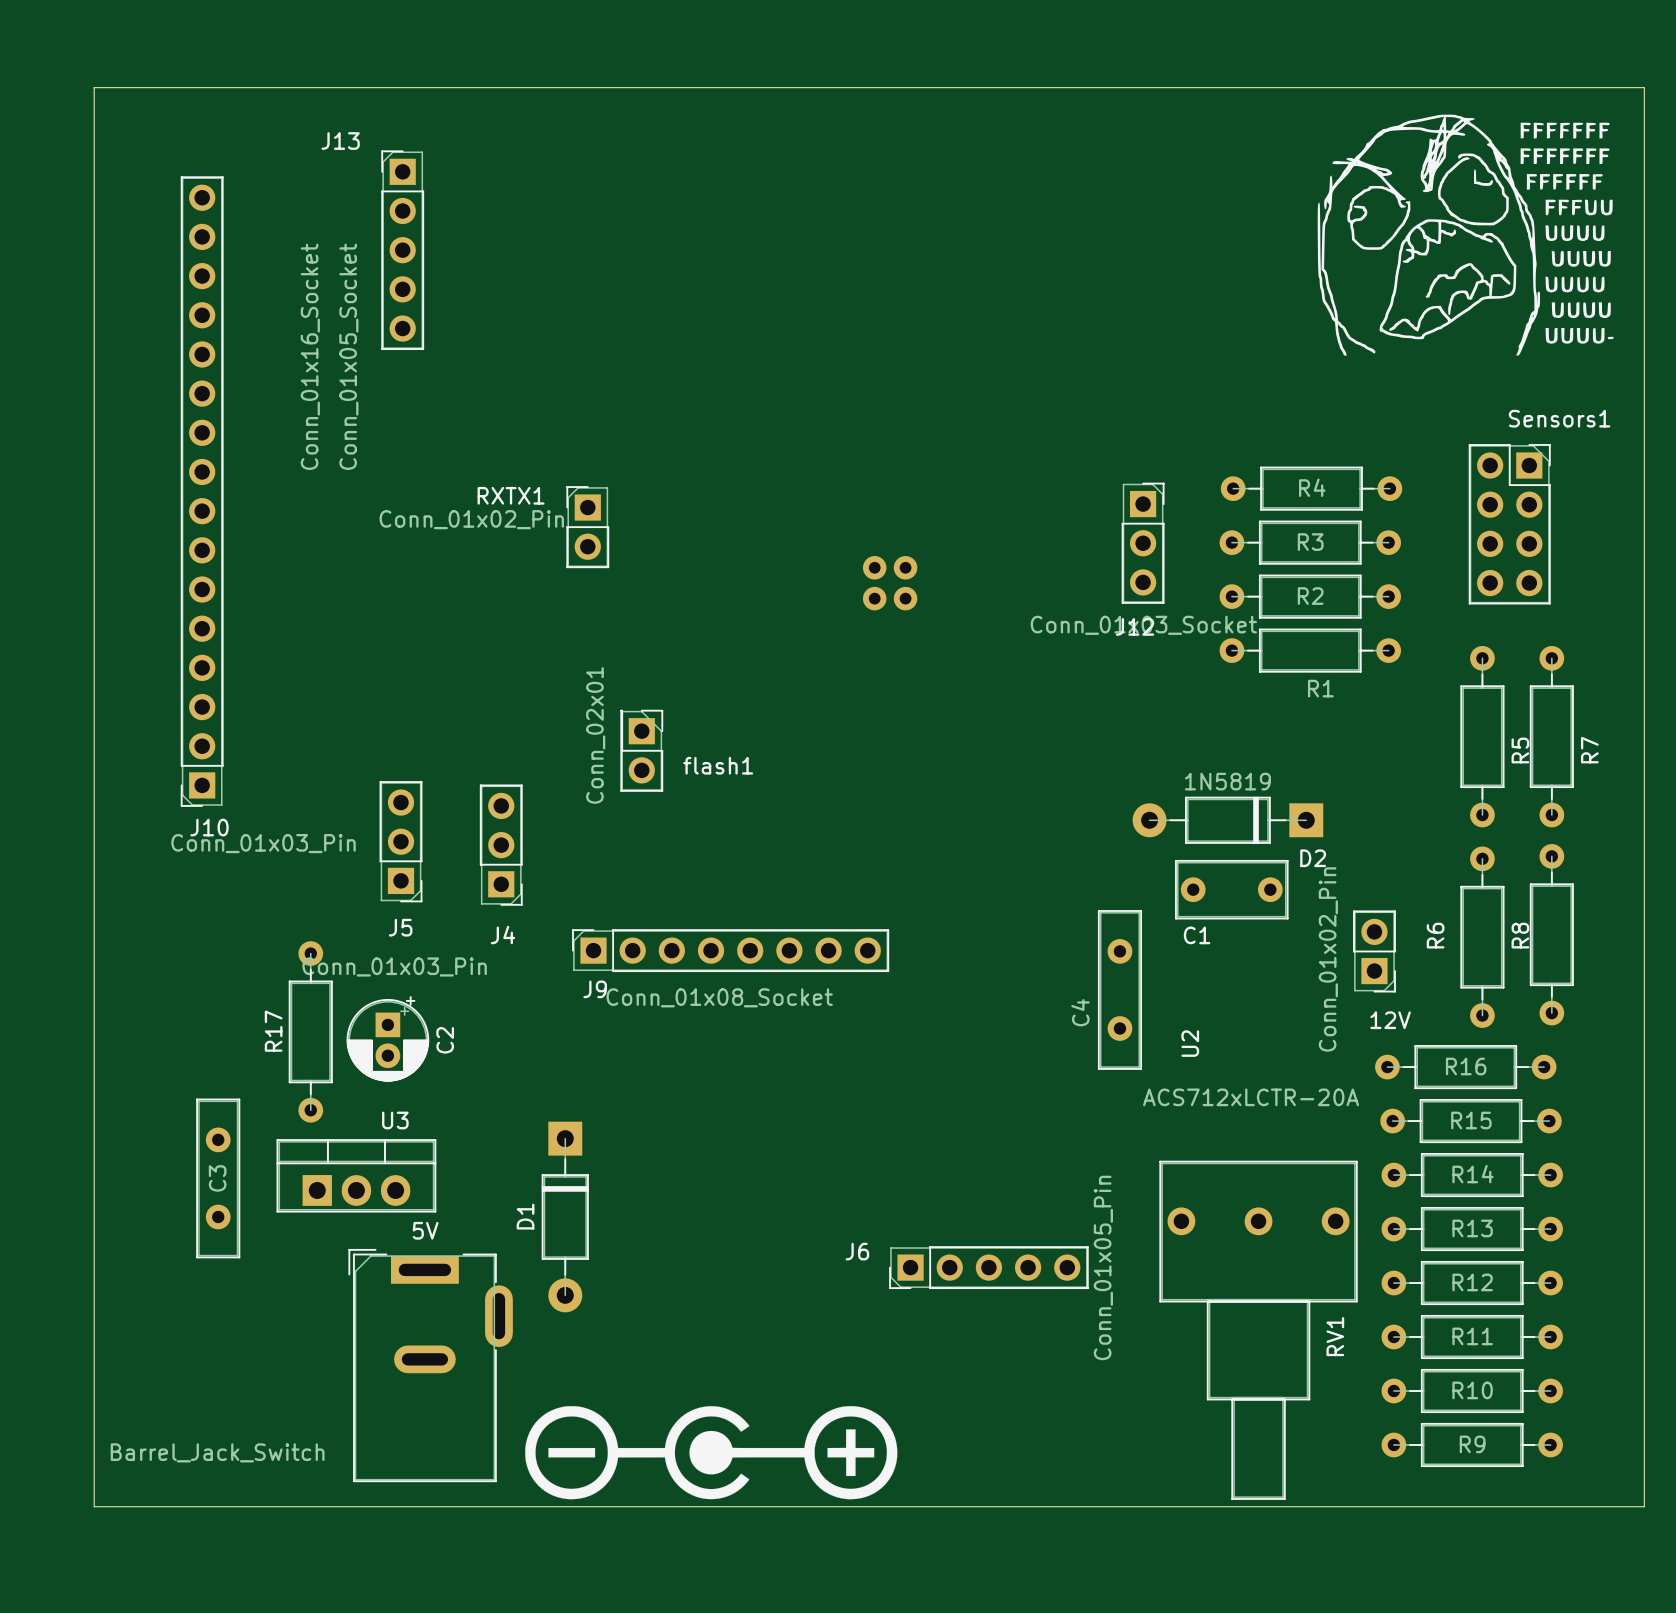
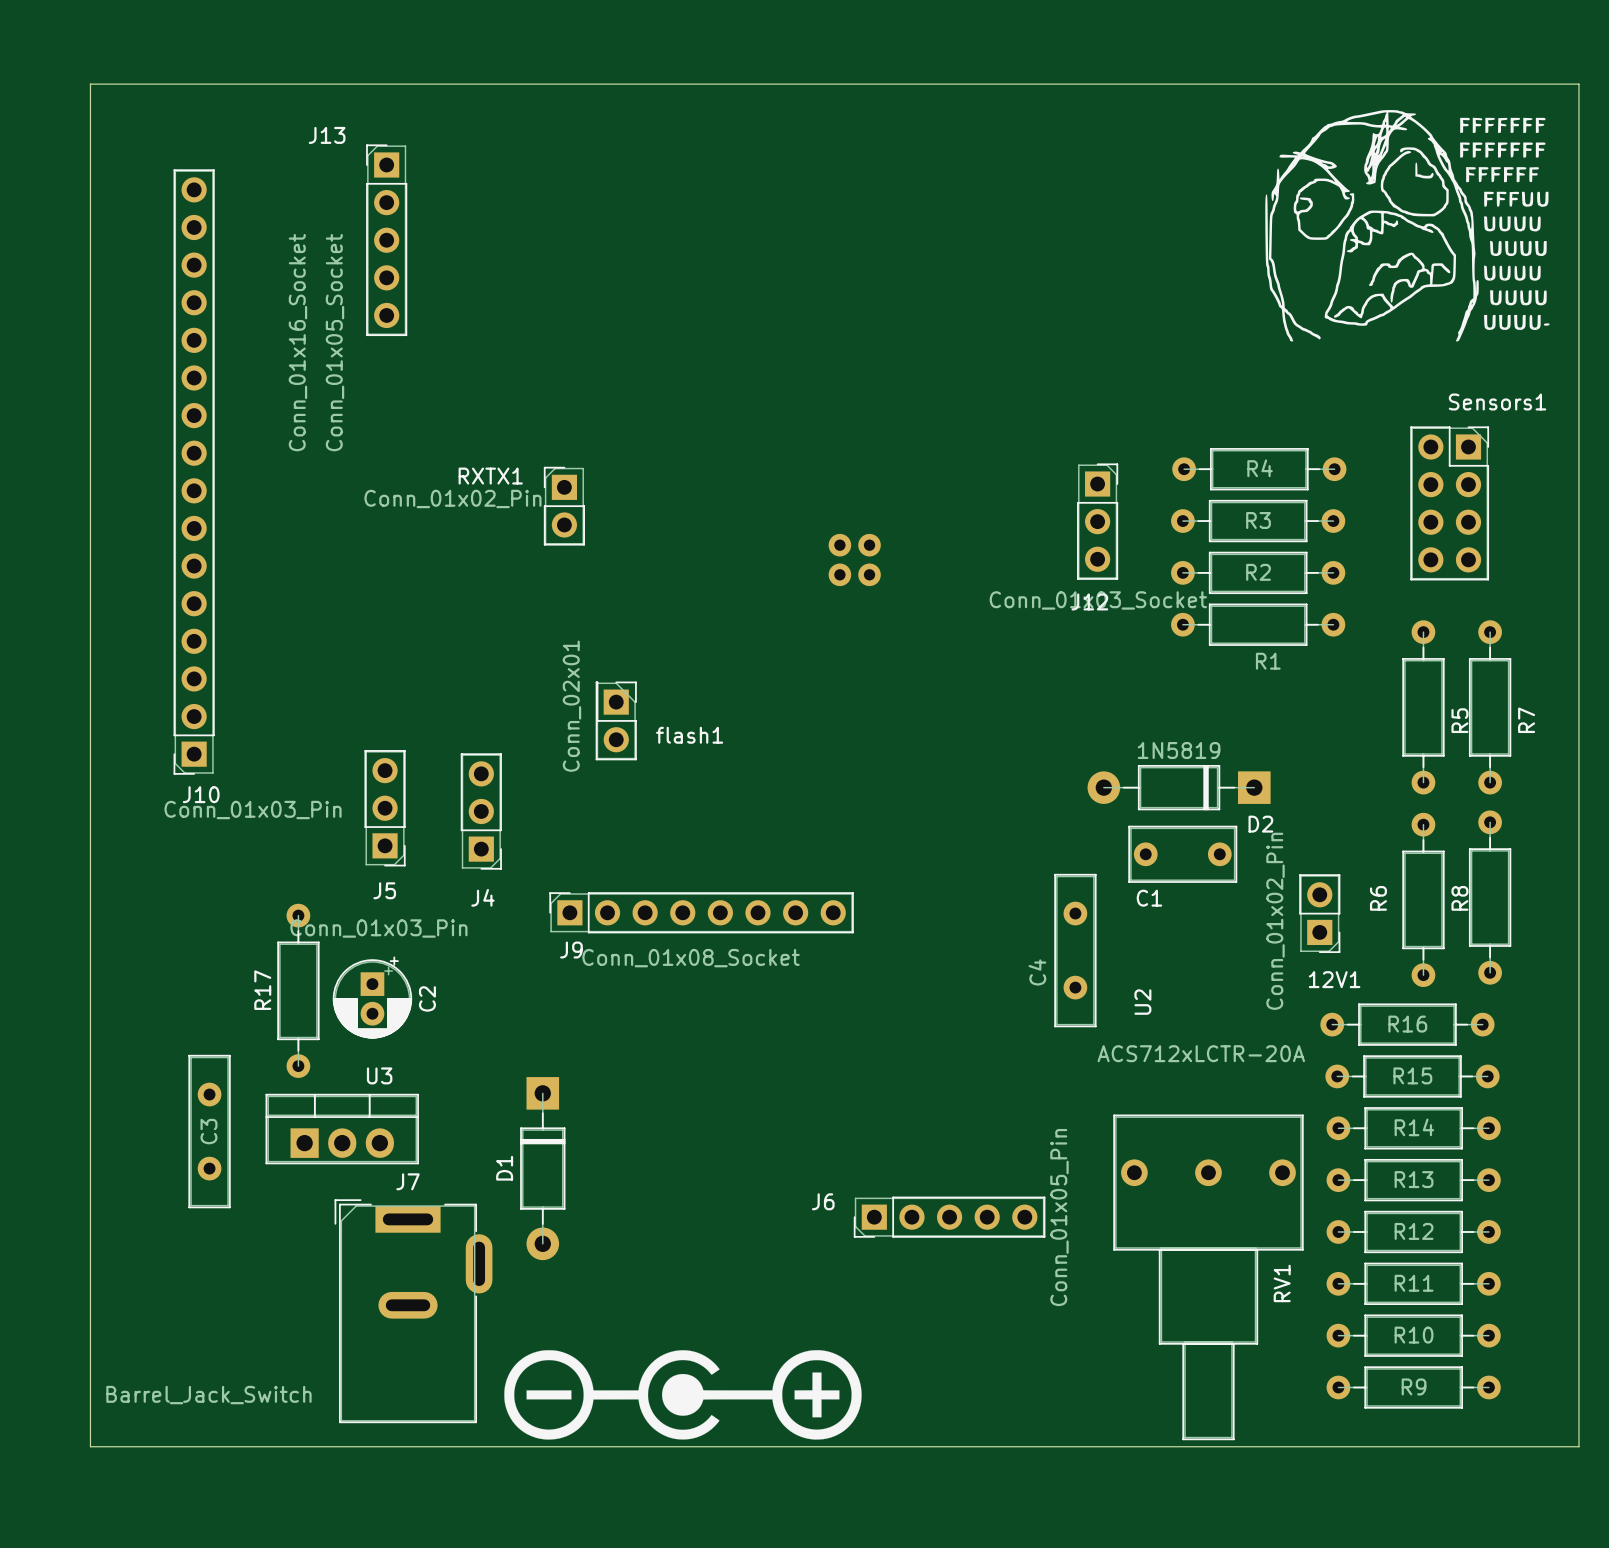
12V name: 12V (1390, 1020) -> 12V1 (1334, 979)
5V name: 5V (425, 1230) -> J7 (408, 1181)

